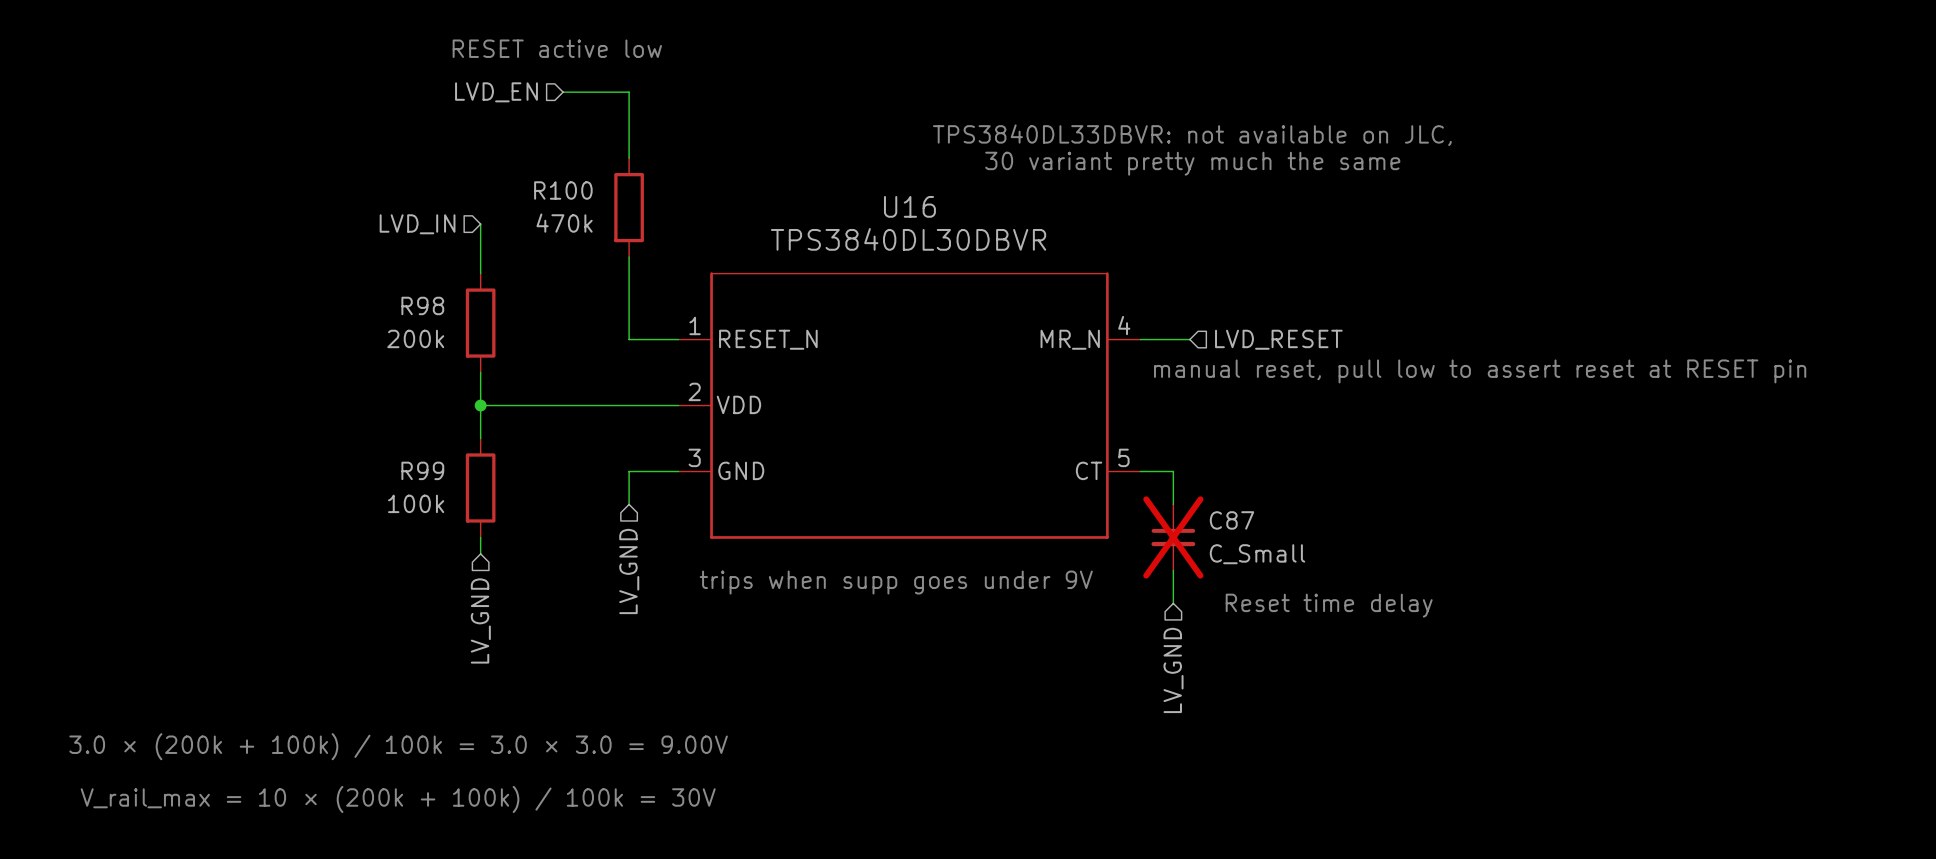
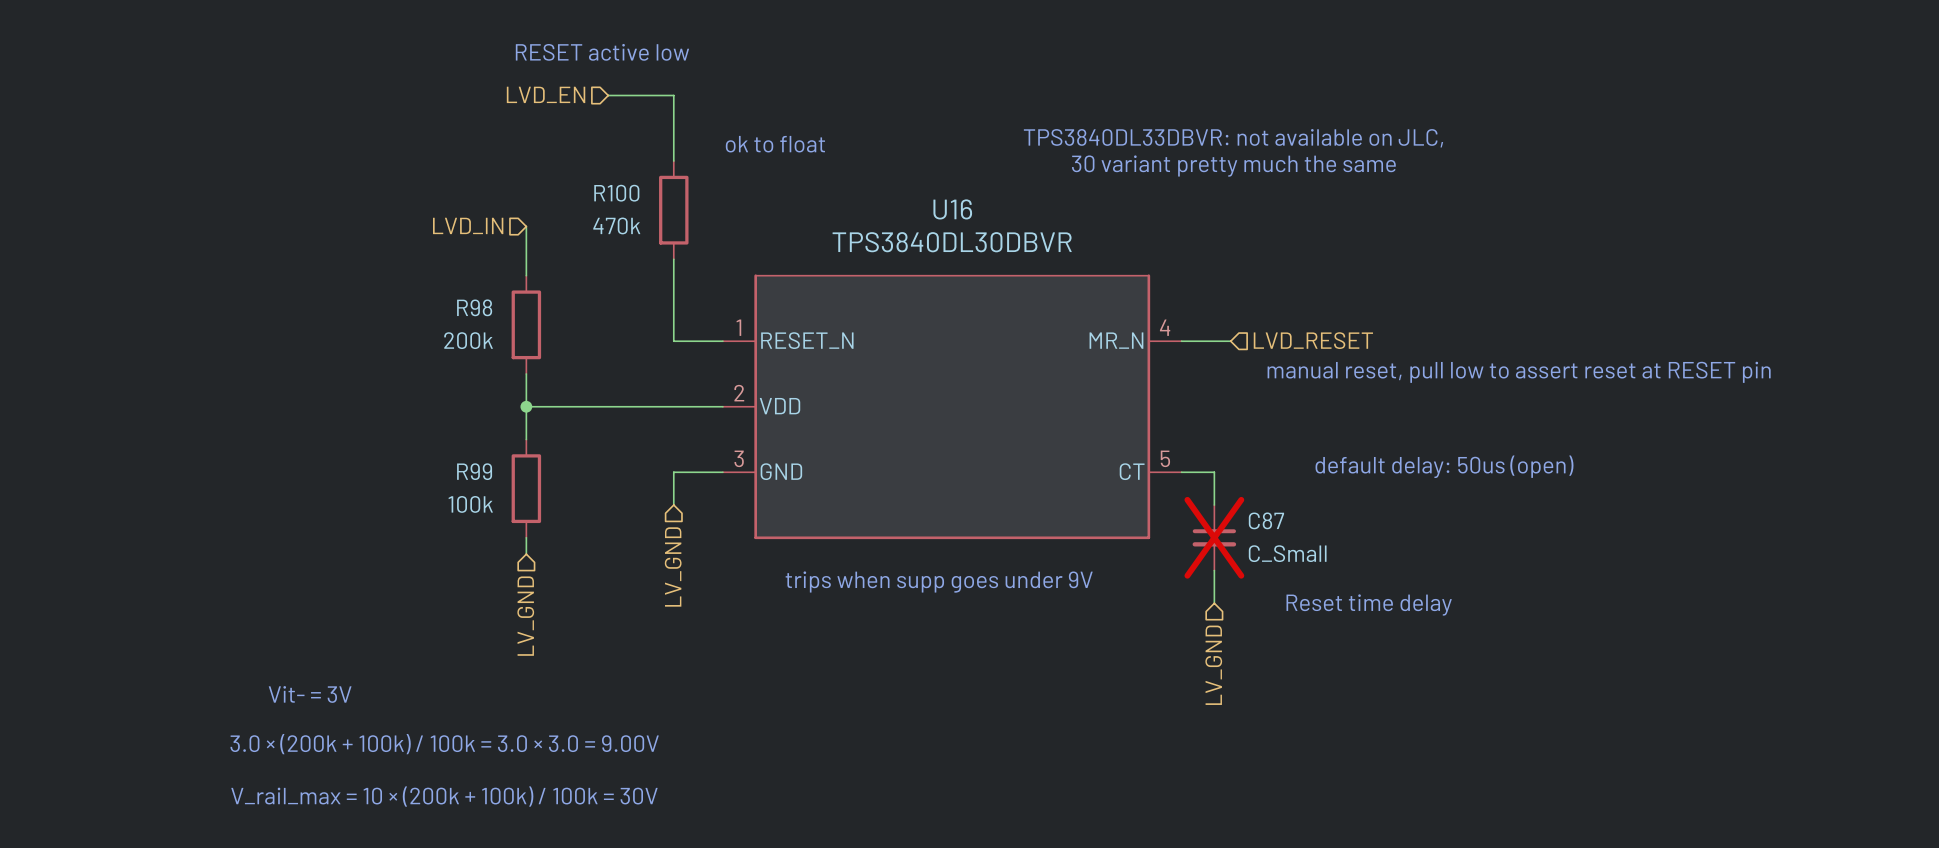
text: none -> ok to float (775, 144)
text: none -> default delay: 50us (open) (1444, 466)
text: none -> Vit- = 3V (310, 694)

